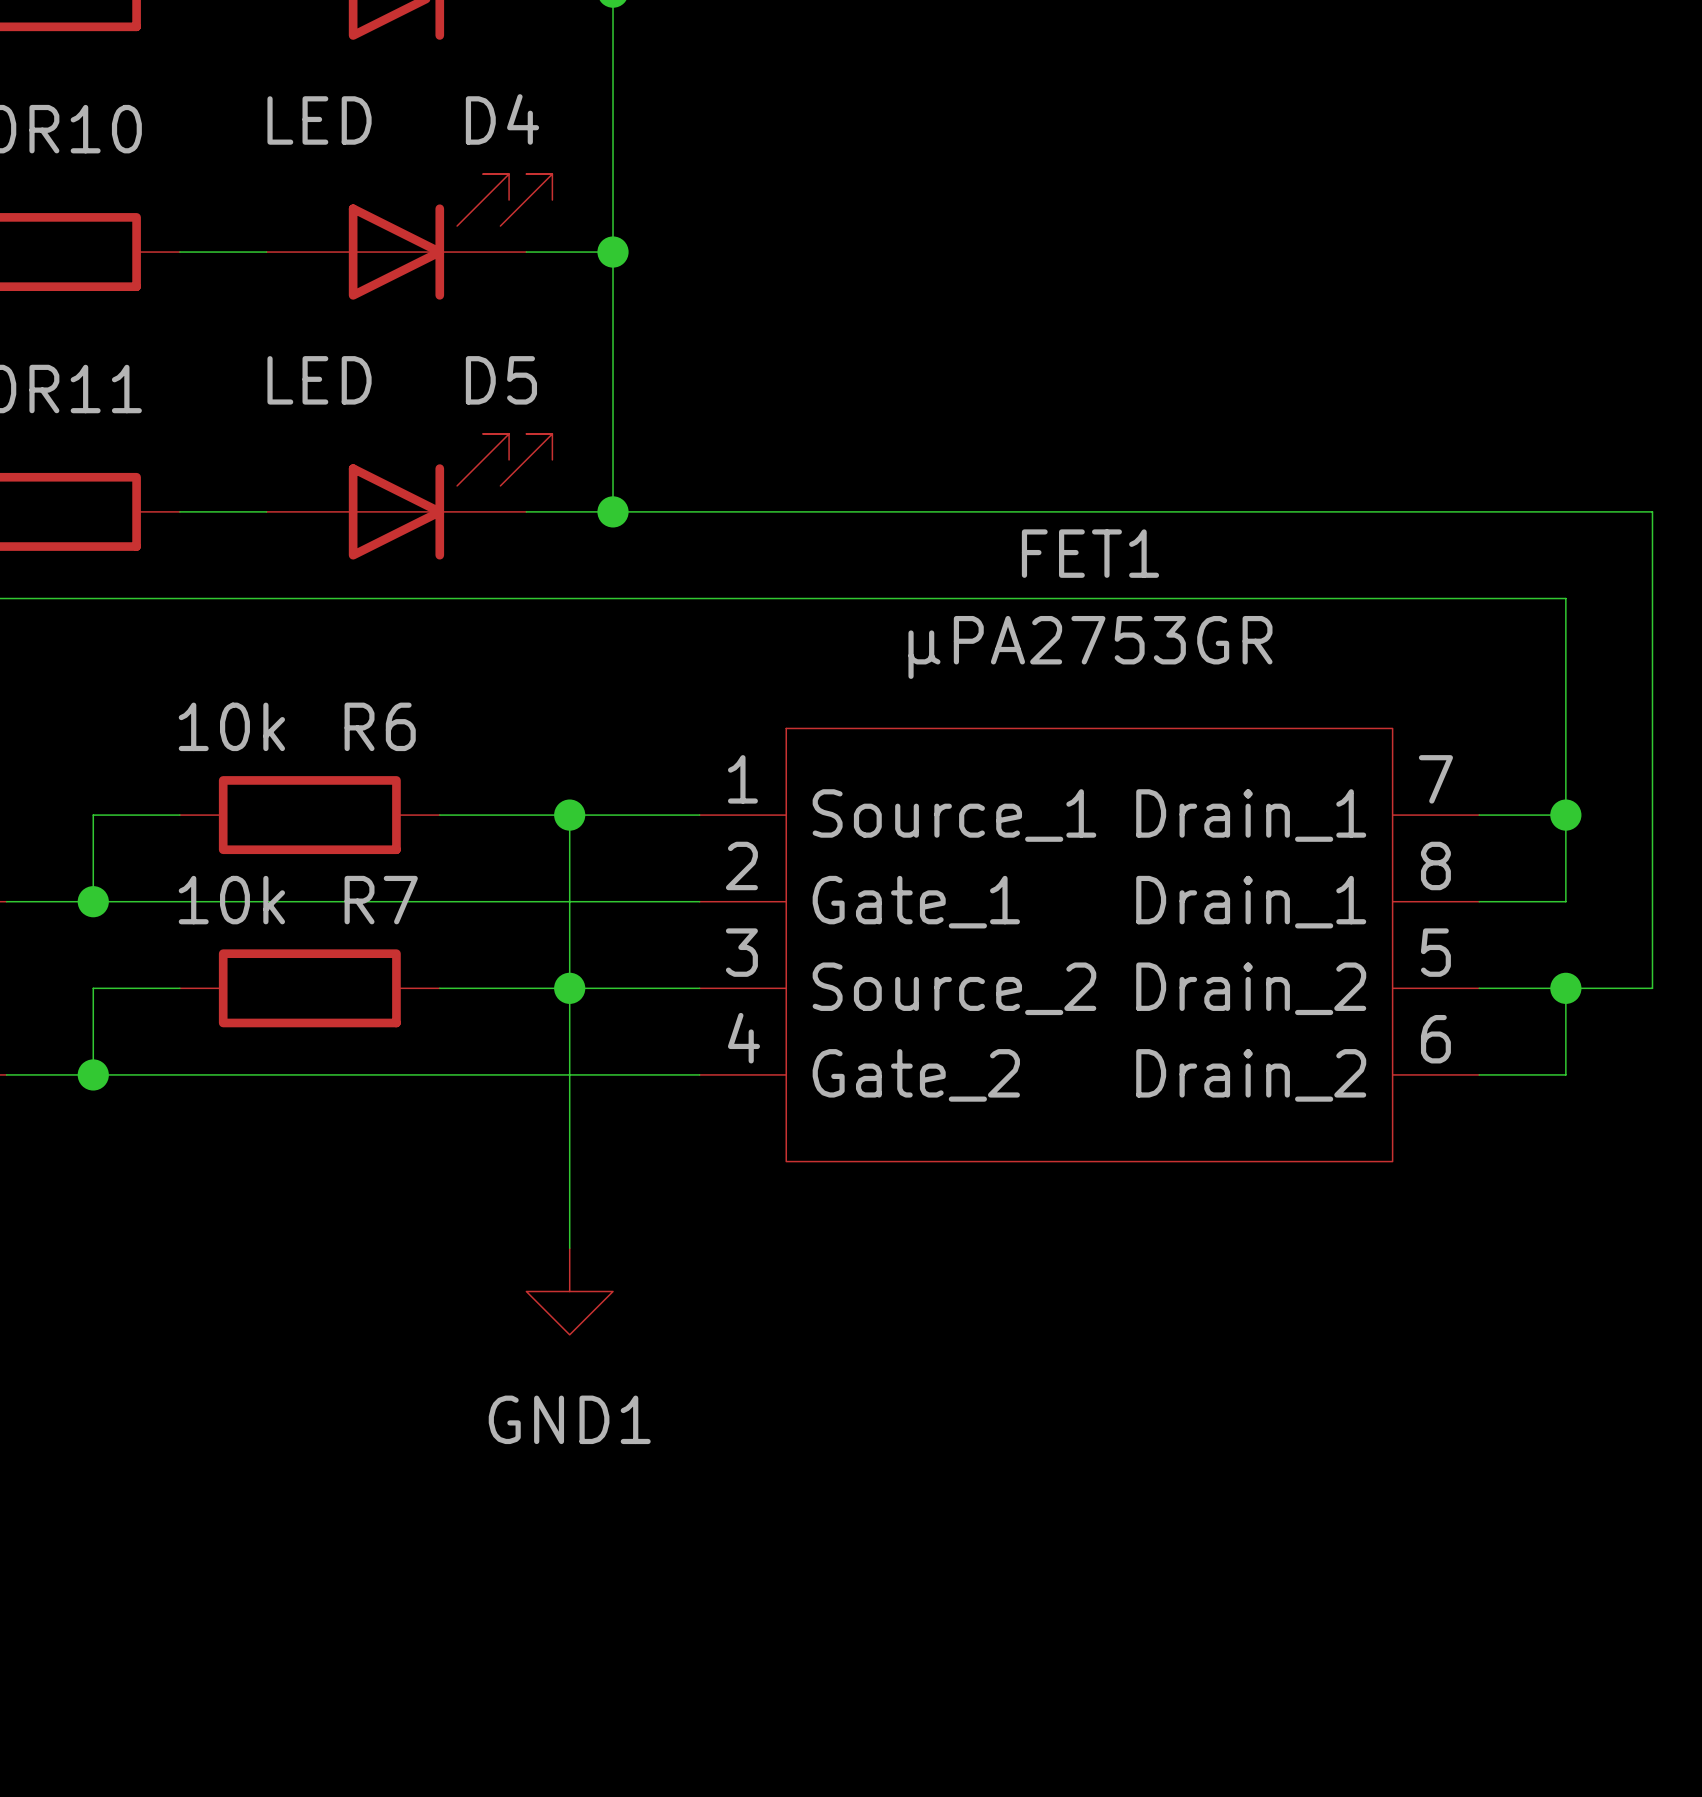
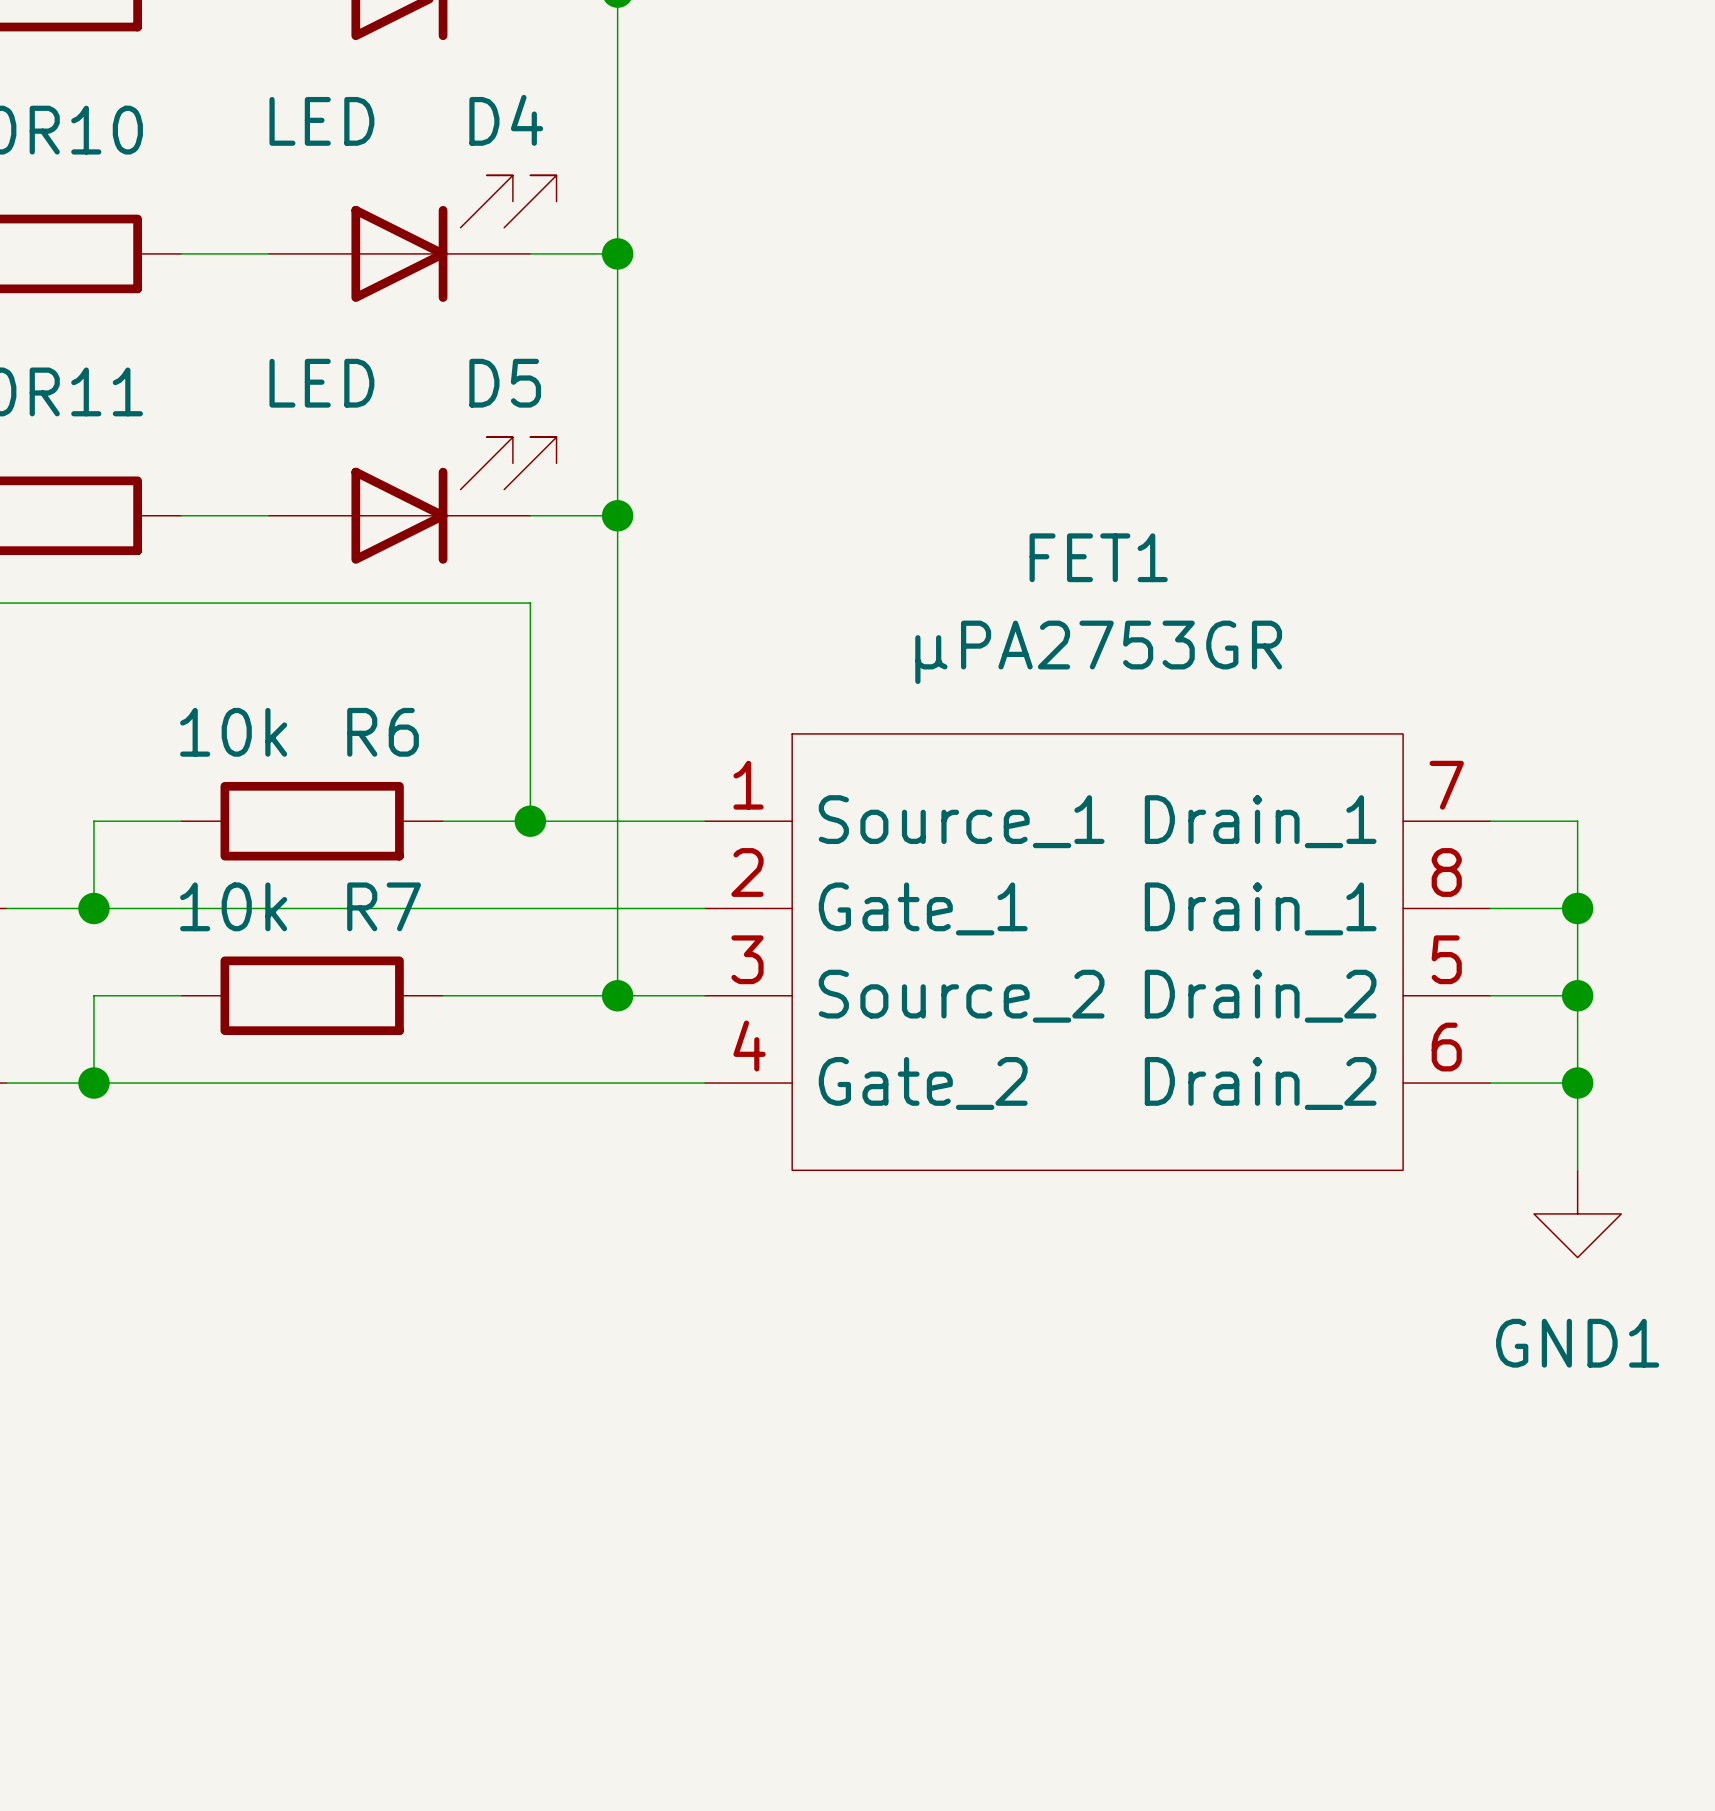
wire: (613, 511) (1652, 511) (1652, 988) (1565, 988) -> (617, 515) (617, 995)
wire: (526, 598) (1565, 598) (1565, 815) -> (530, 603) (530, 821)
wire: (569, 815) (569, 1248) -> none
junction position: (569, 815) -> (530, 821)
junction position: (1565, 815) -> (1577, 908)
wire: none -> (1577, 908) (1577, 995)
junction position: (569, 988) -> (617, 995)
wire: none -> (1577, 1083) (1577, 1170)
junction: none -> (1577, 1083)
power symbol: none -> GND1 (1577, 1213)
power symbol: GND1 (569, 1291) -> none

